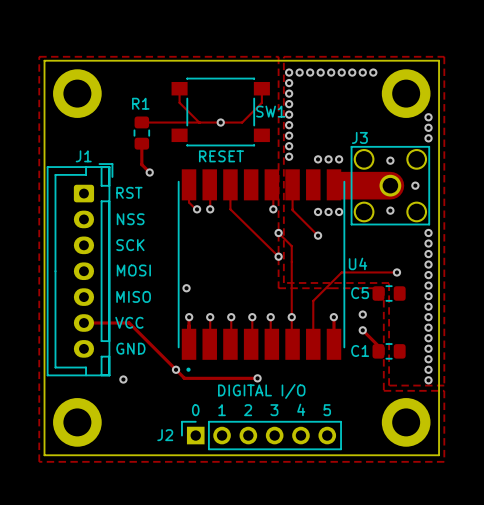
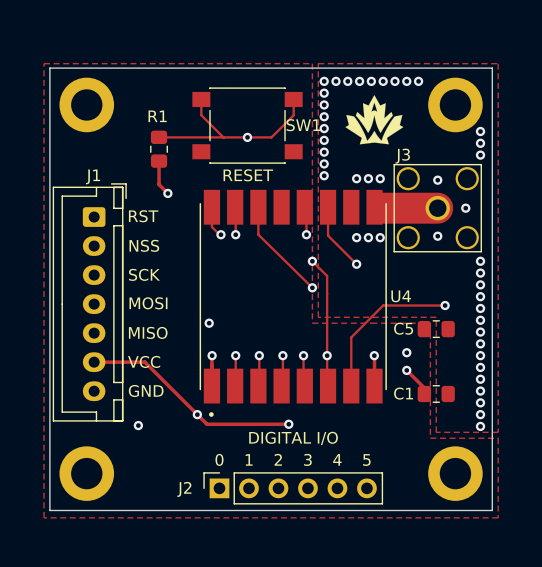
drawing: none -> [345, 95, 404, 145]

